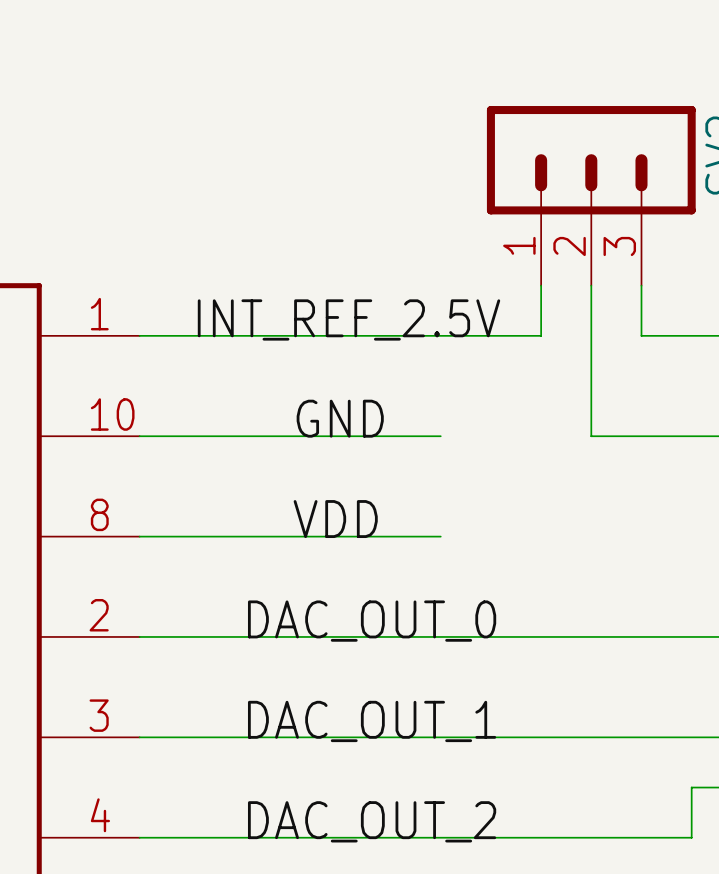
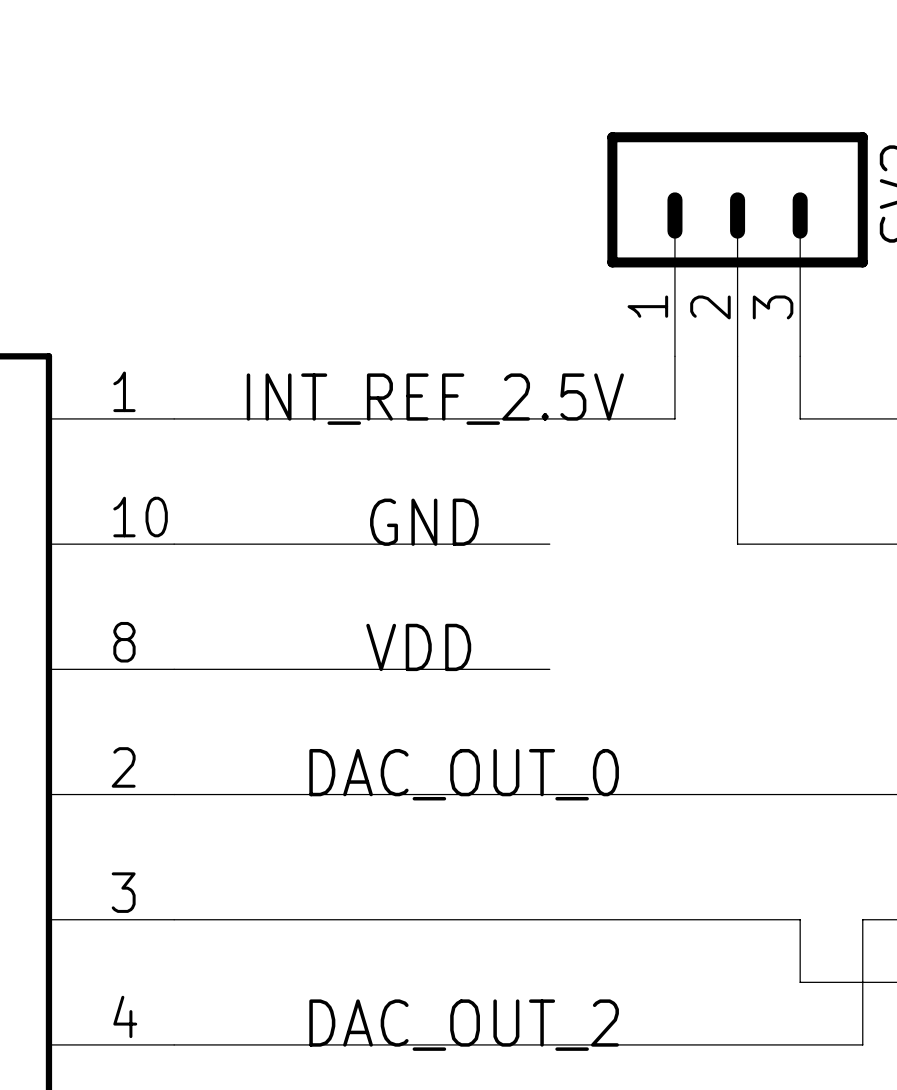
label: DAC_OUT_1 (372, 721) -> none
wire: (641, 737) (691, 737) -> (800, 919) (800, 982) (862, 982) (862, 919)

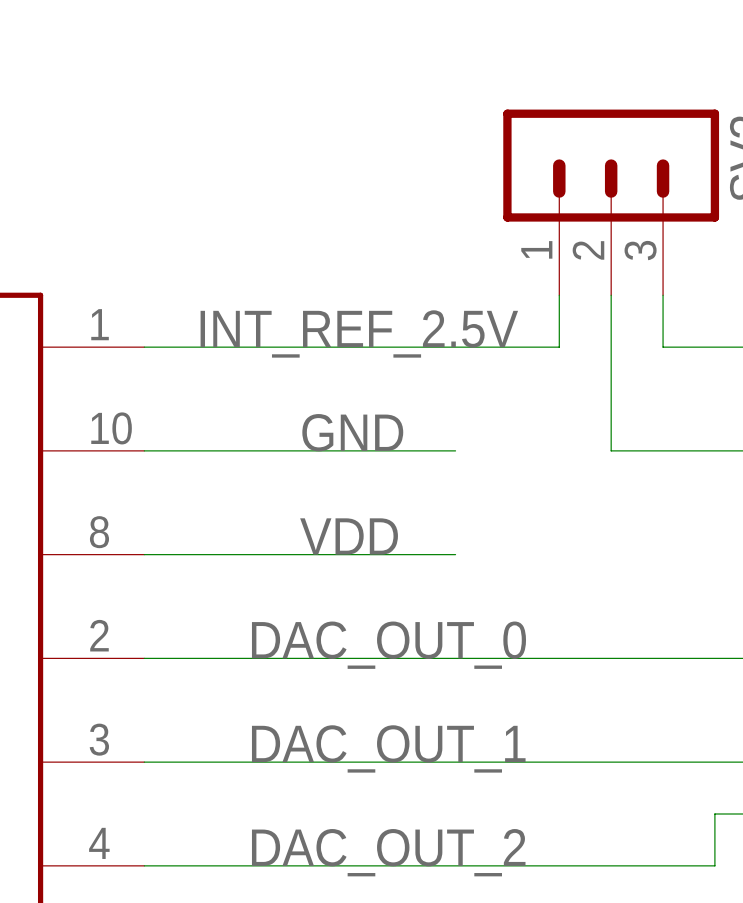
label: none -> DAC_OUT_1 (388, 748)
wire: (800, 919) (800, 982) (862, 982) (862, 919) -> (663, 762) (714, 762)

